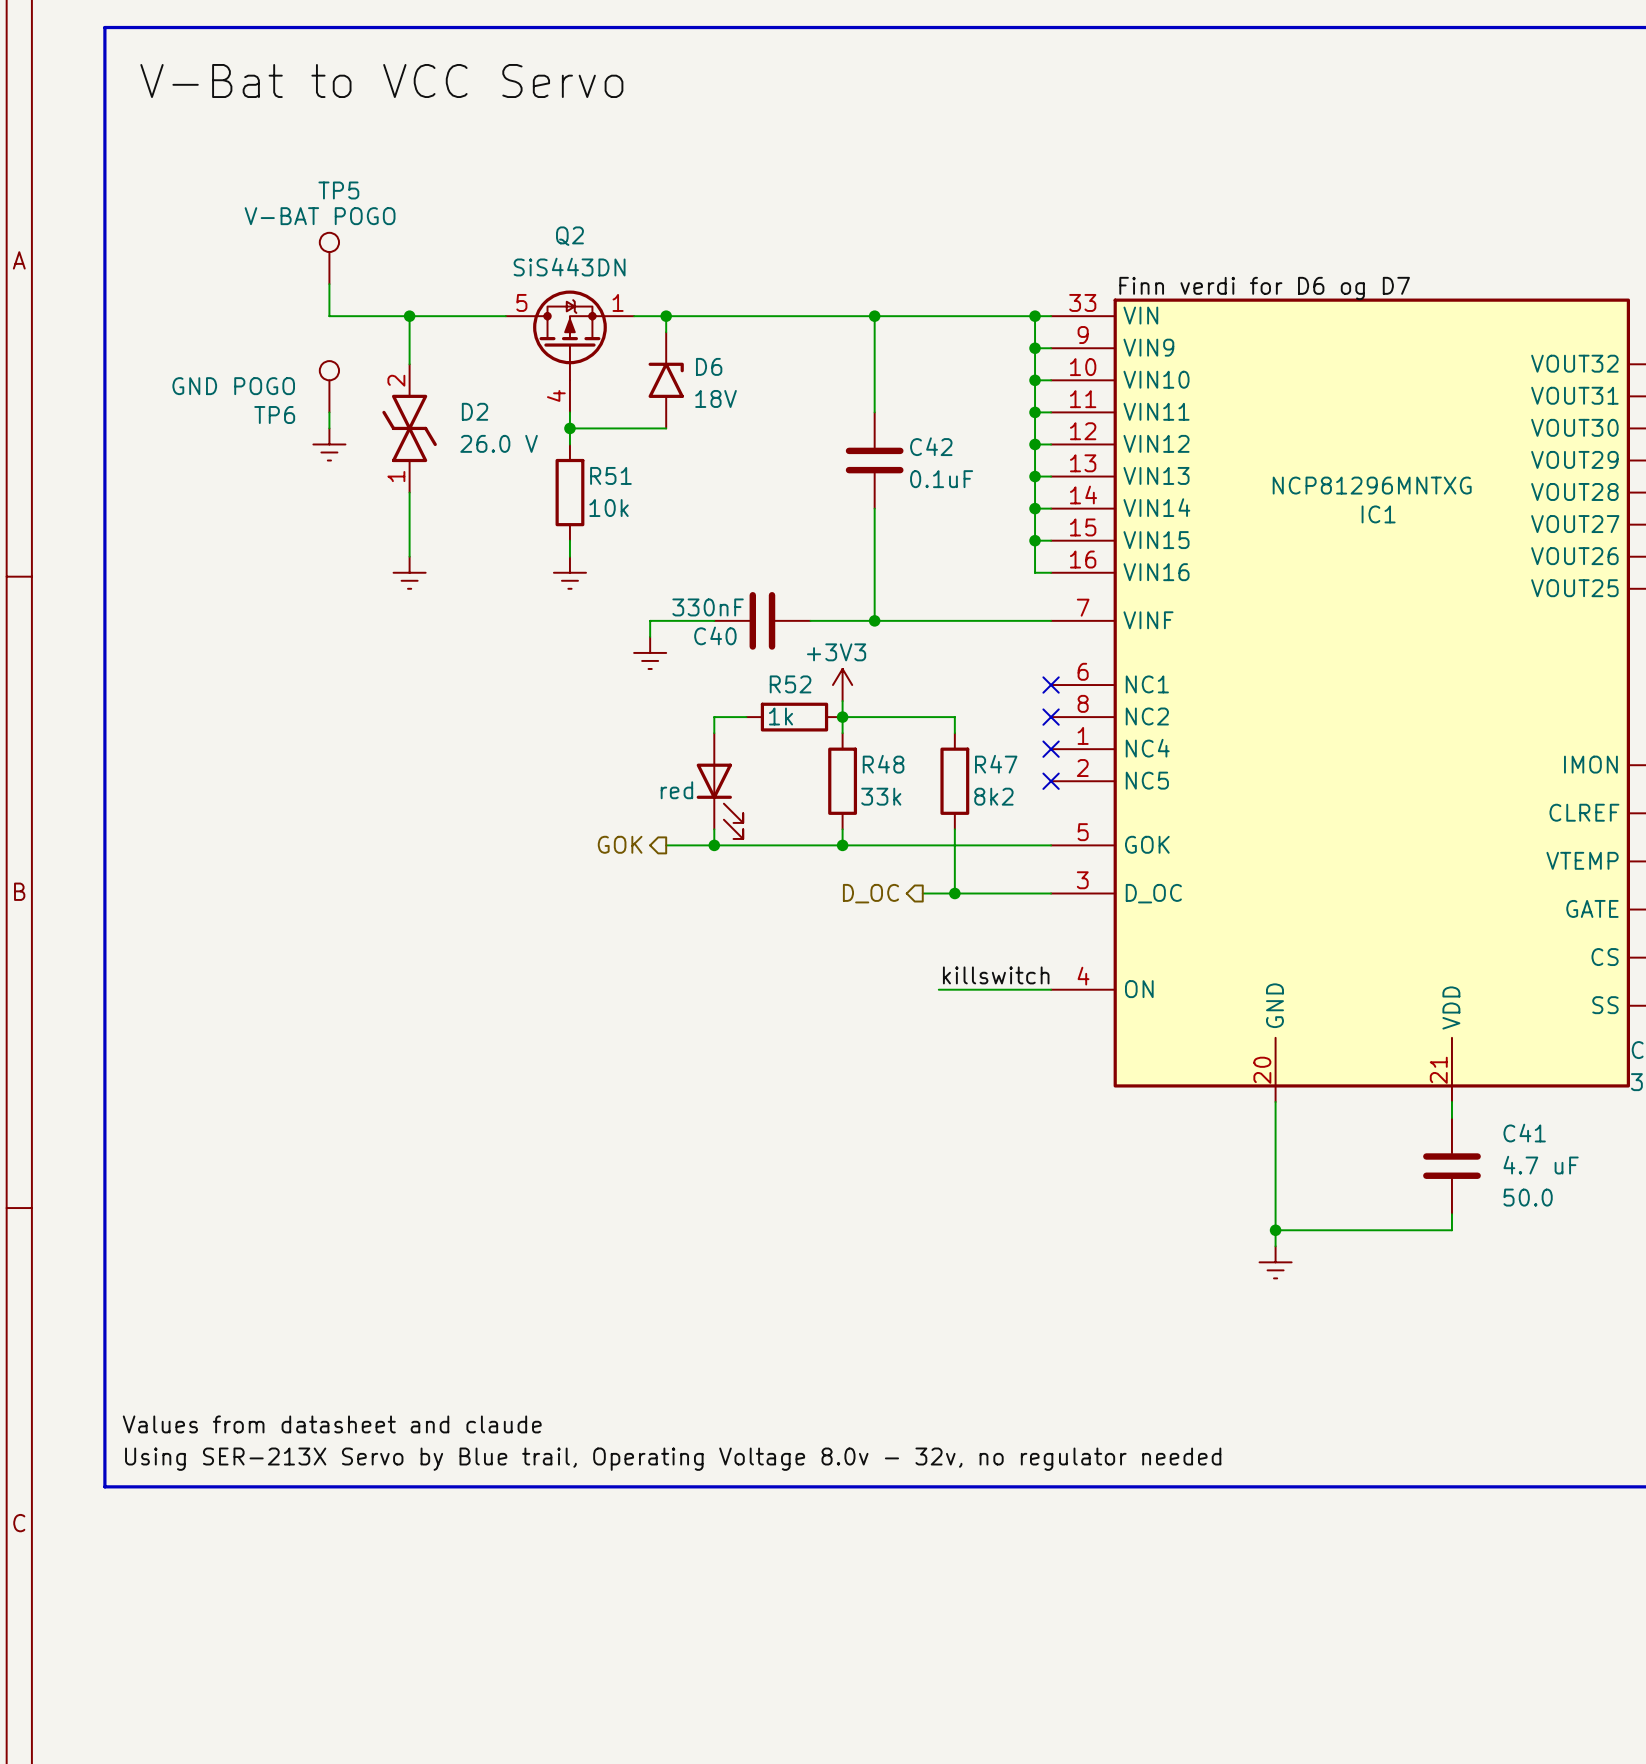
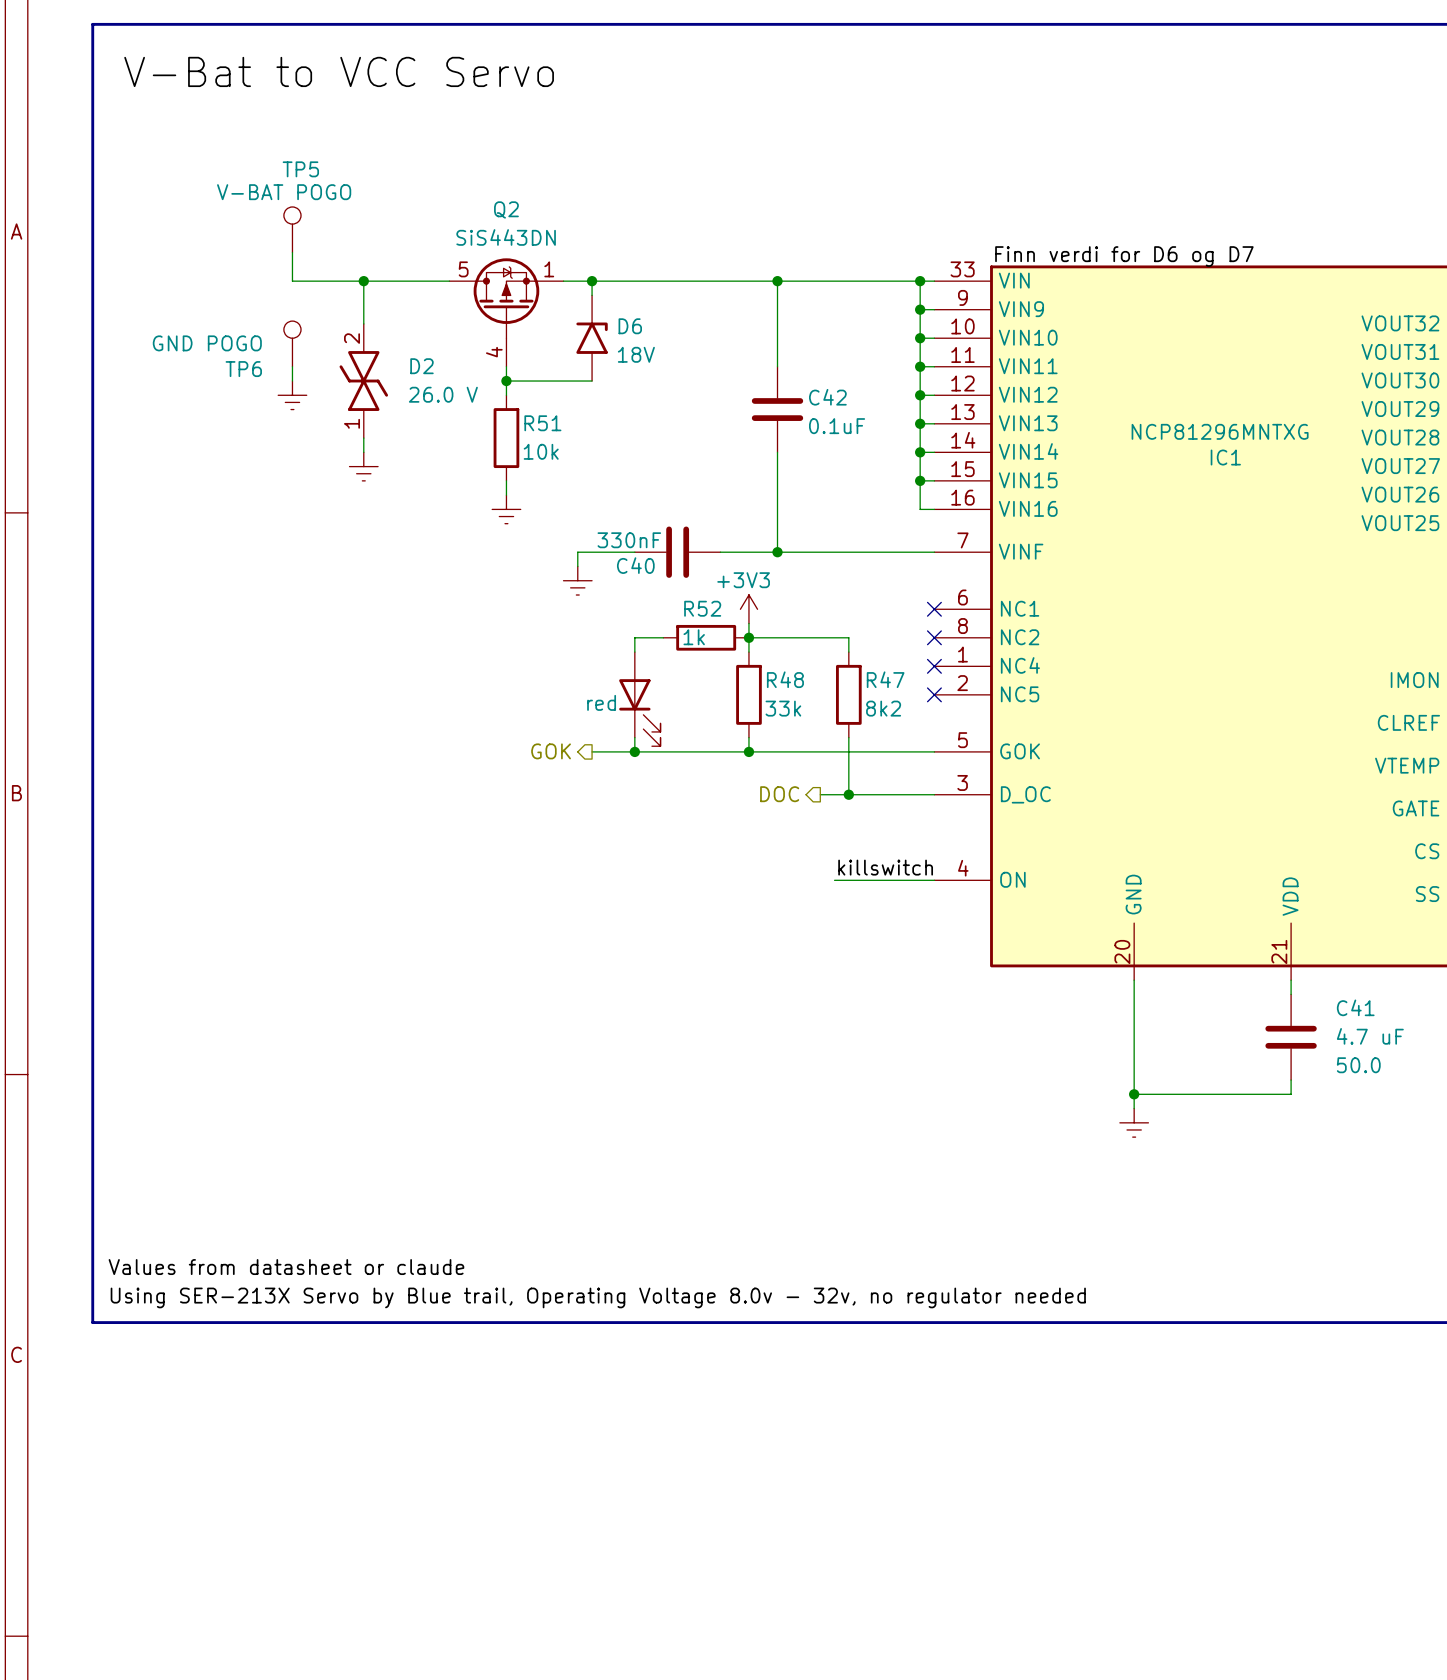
wire: (409, 508) (409, 556) -> none
power symbol position: (409, 572) -> (363, 466)
hierarchical label: D_OC (870, 893) -> DOC (779, 794)
label: Values from datasheet and claude (332, 1424) -> Values from datasheet or claude (286, 1267)

